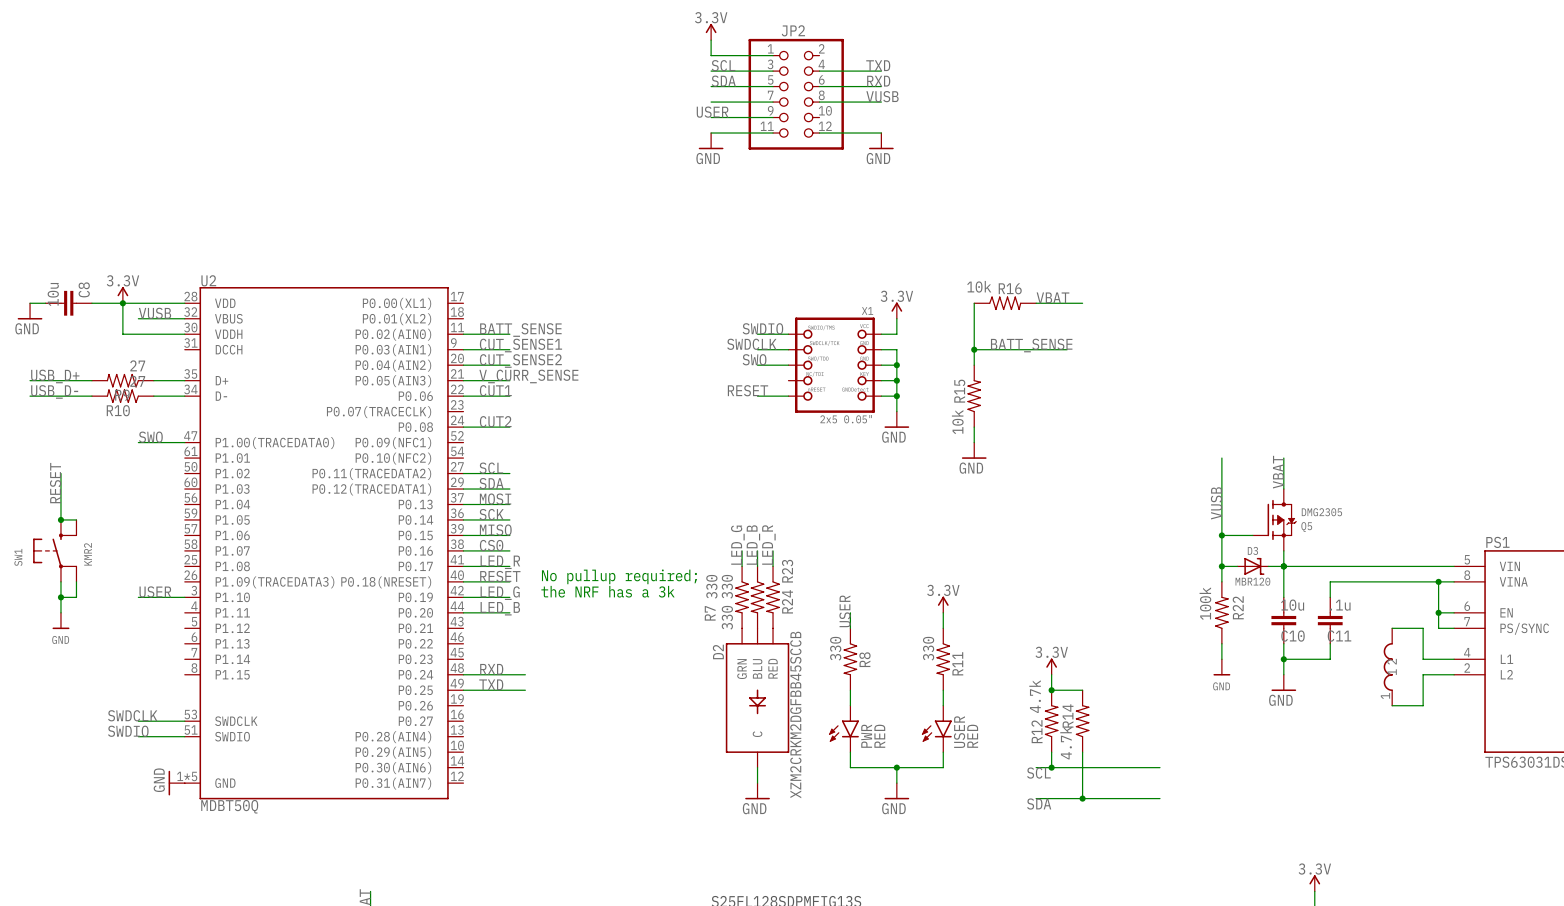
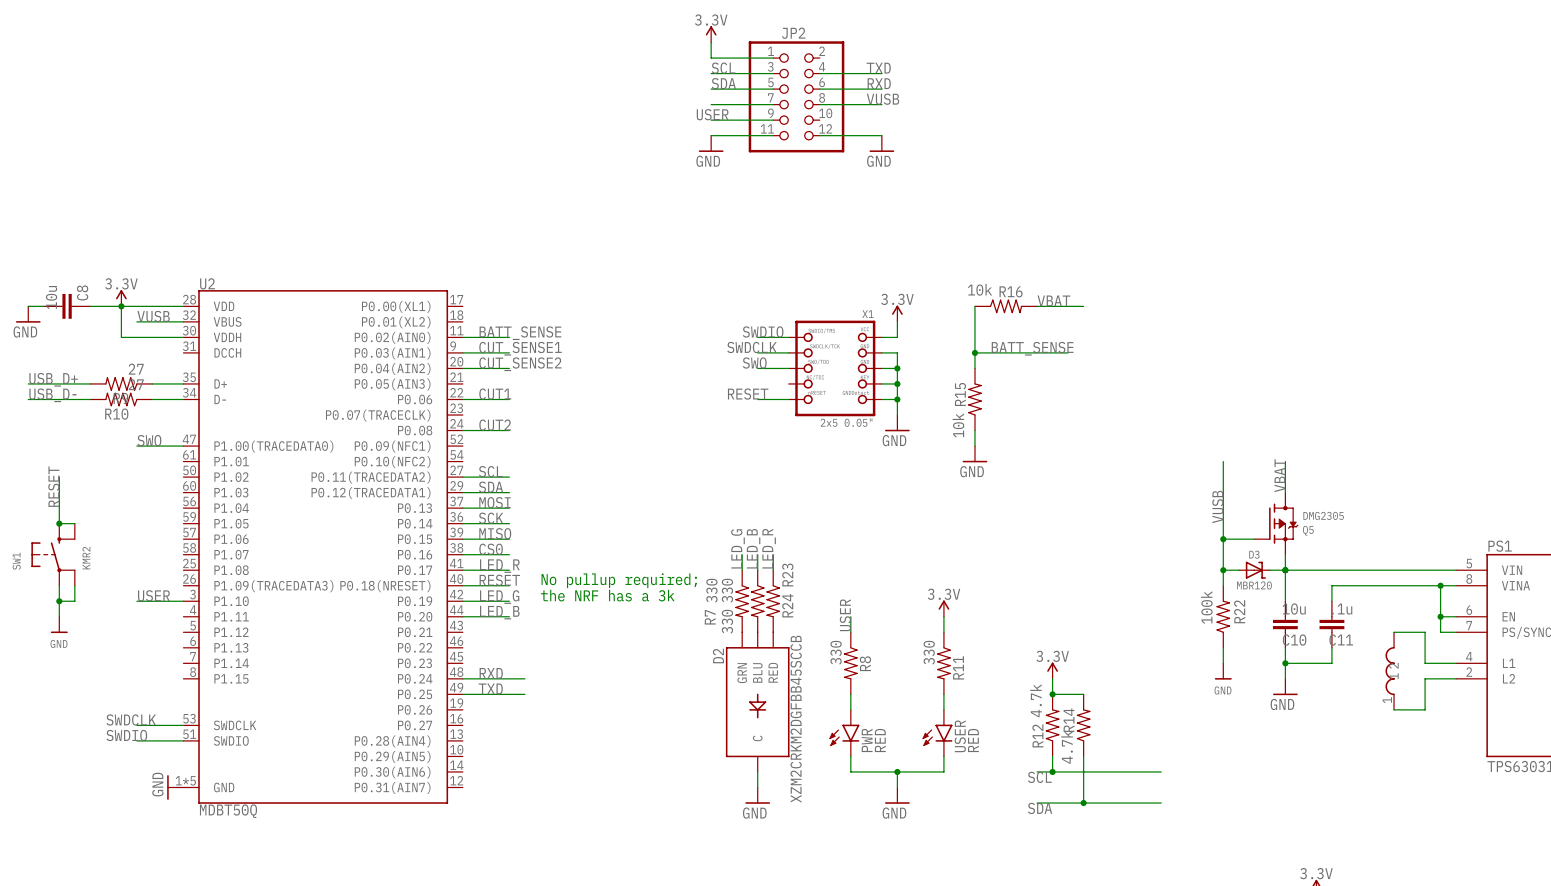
label: V_CURR_SENSE (528, 376) -> none
wire: (463, 380) (509, 380) -> none

